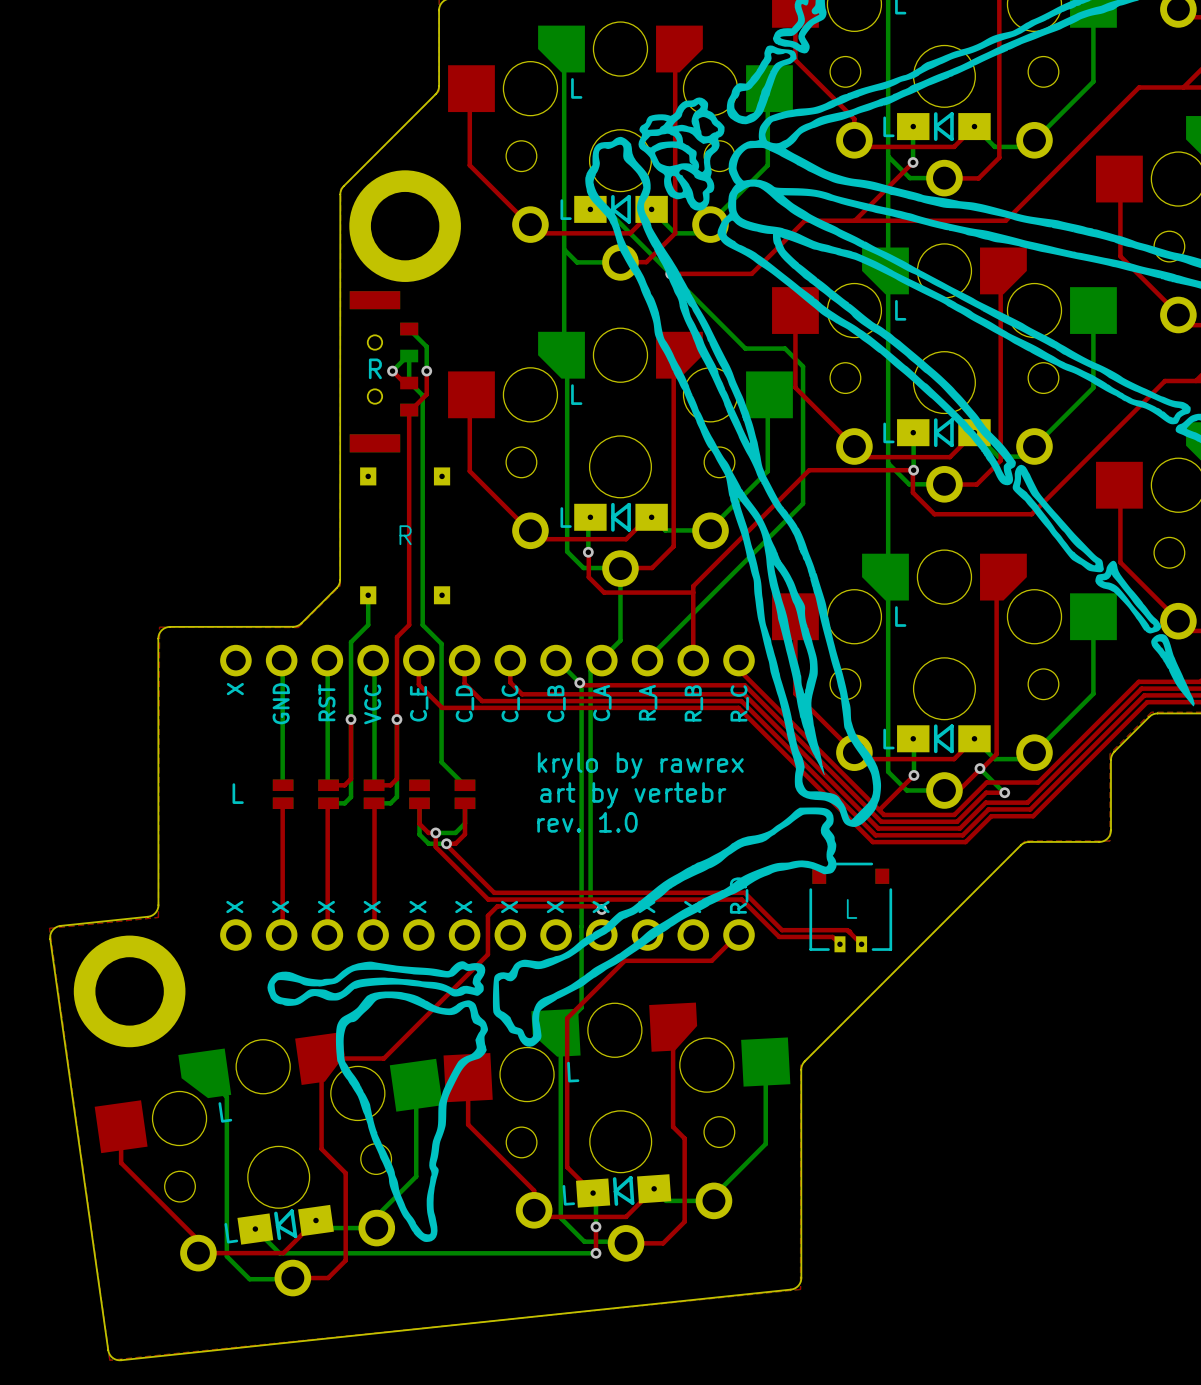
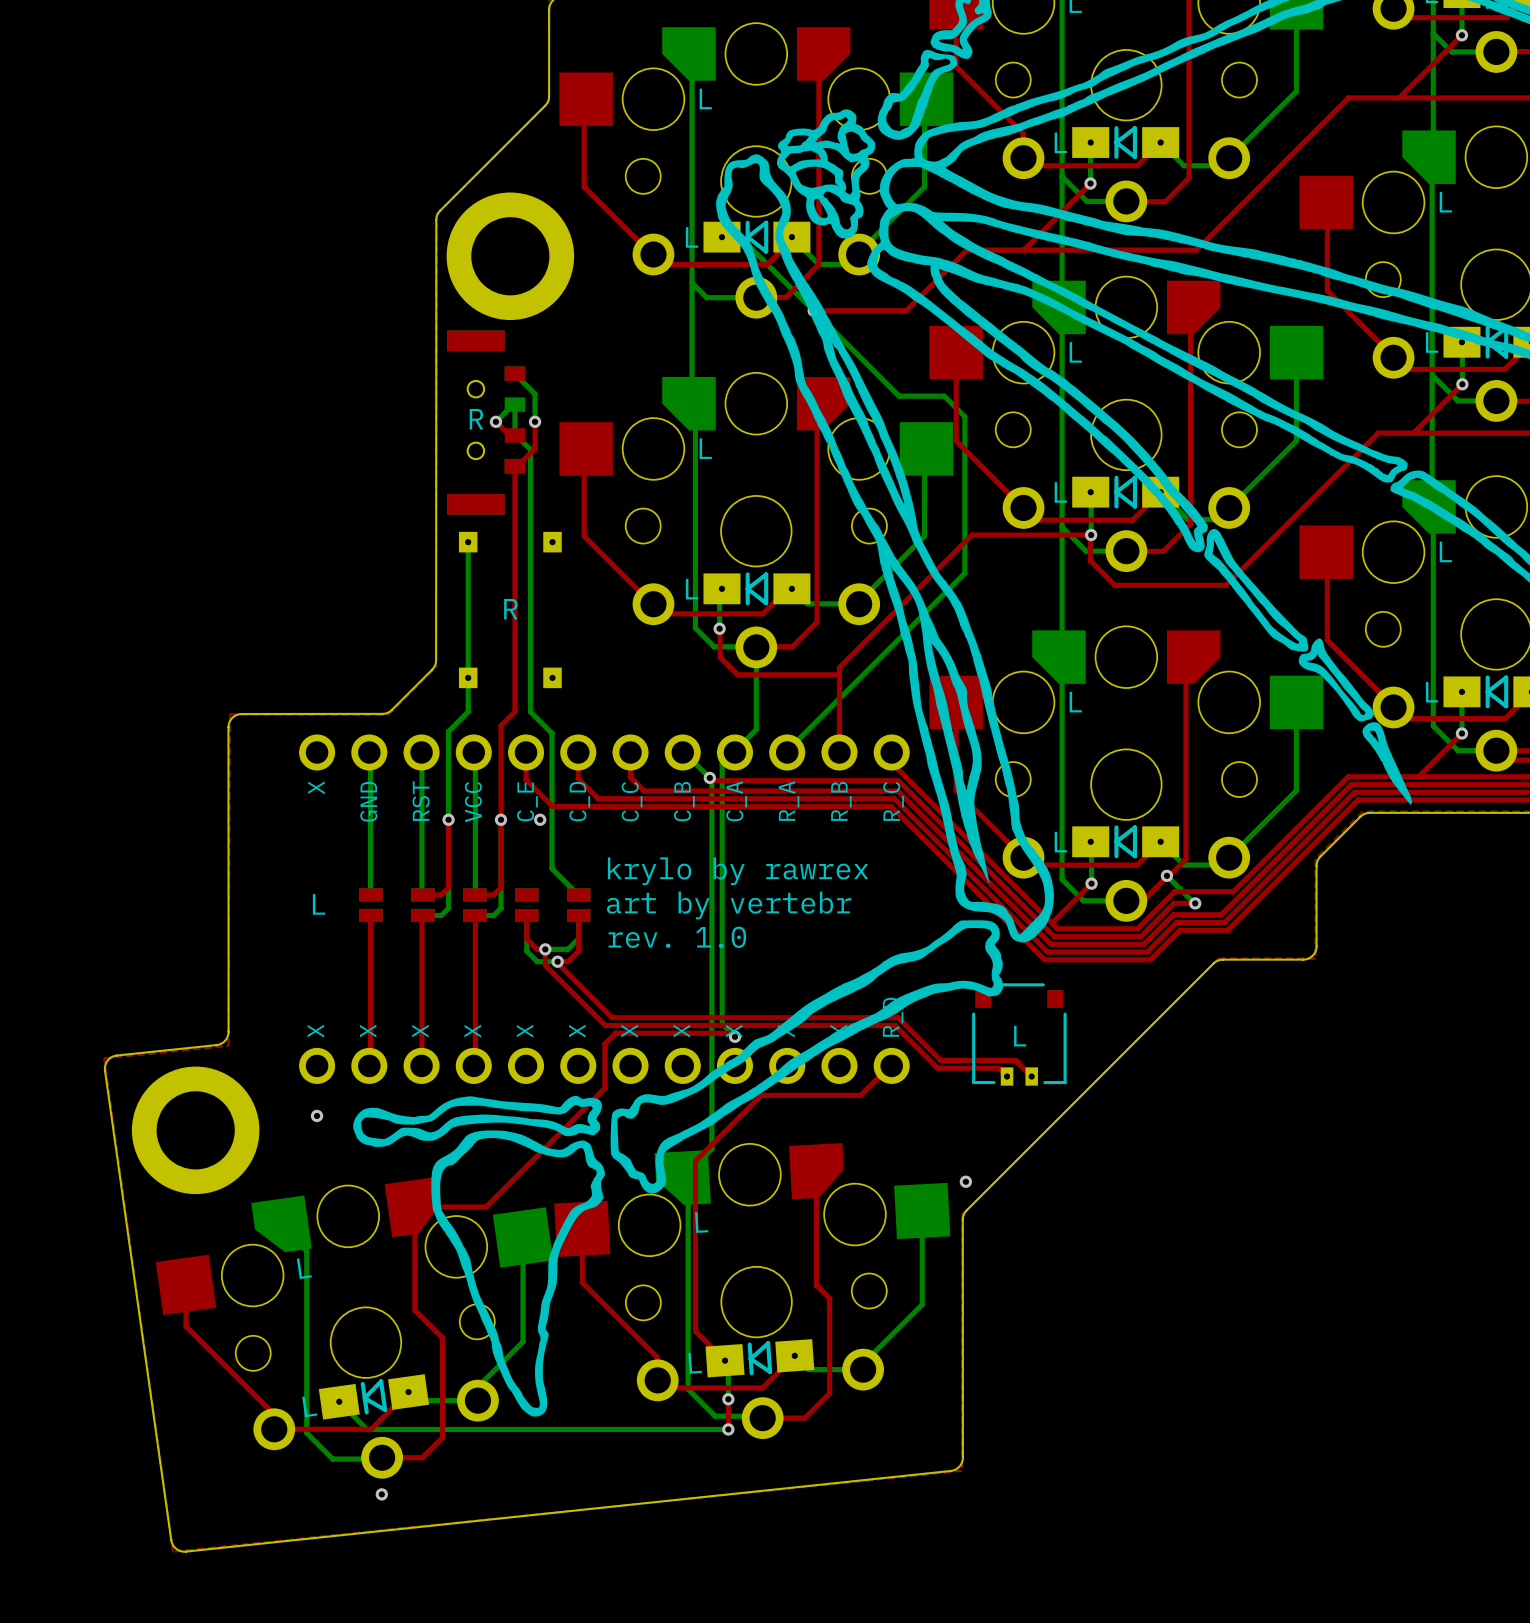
bottom track: none -> (468, 542) (468, 677)
via: none -> (540, 819)
drawing position: (640, 792) -> (737, 902)
via: none -> (317, 1115)
via: none -> (965, 1181)
via: none -> (381, 1494)

